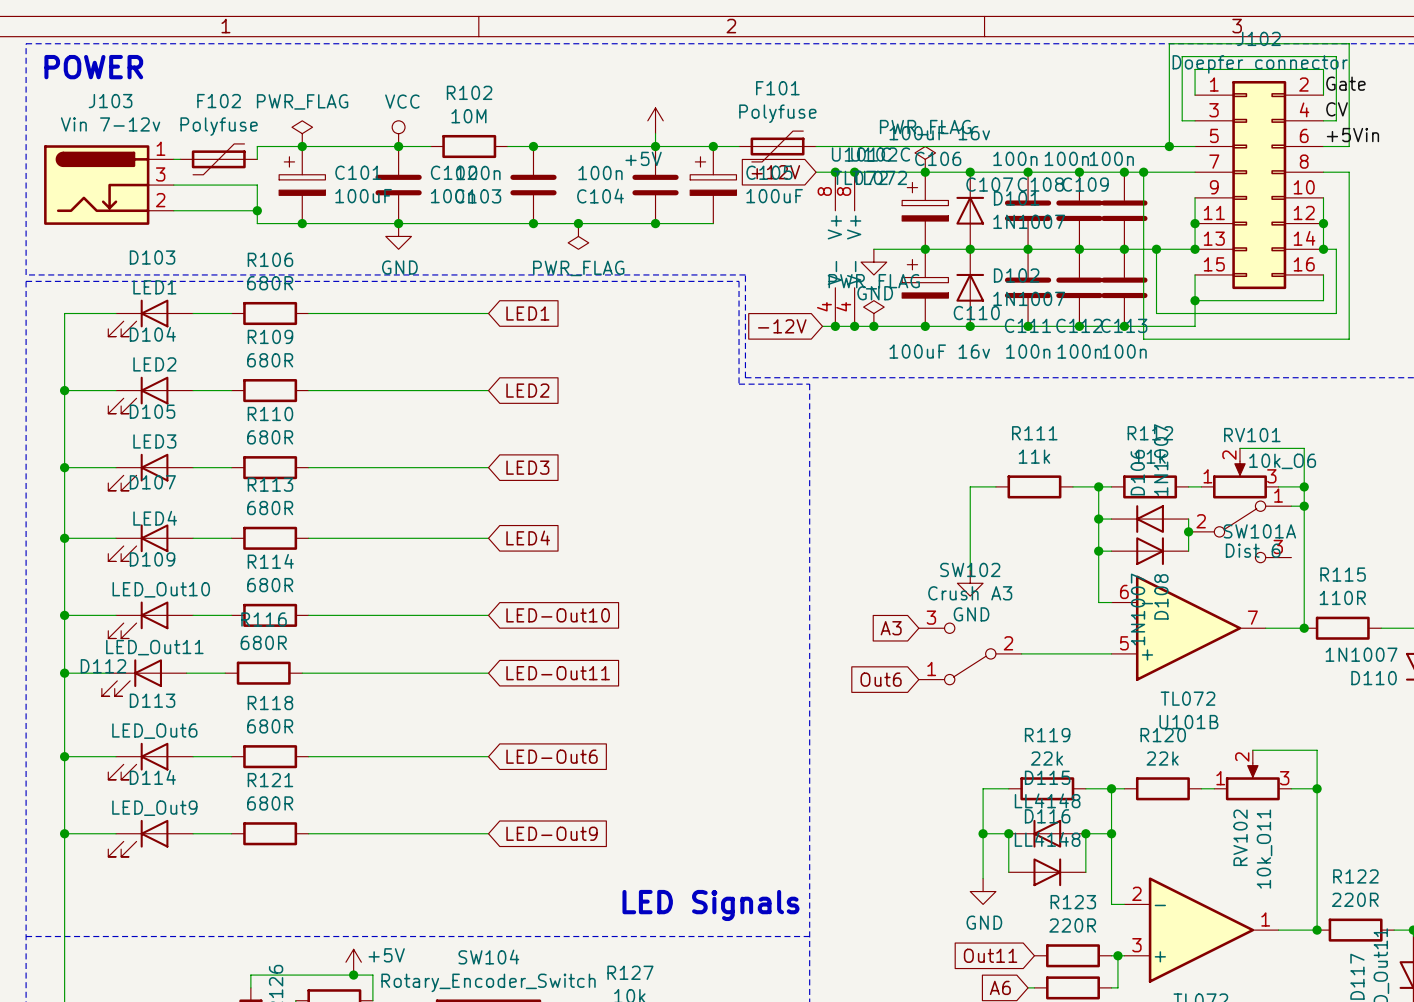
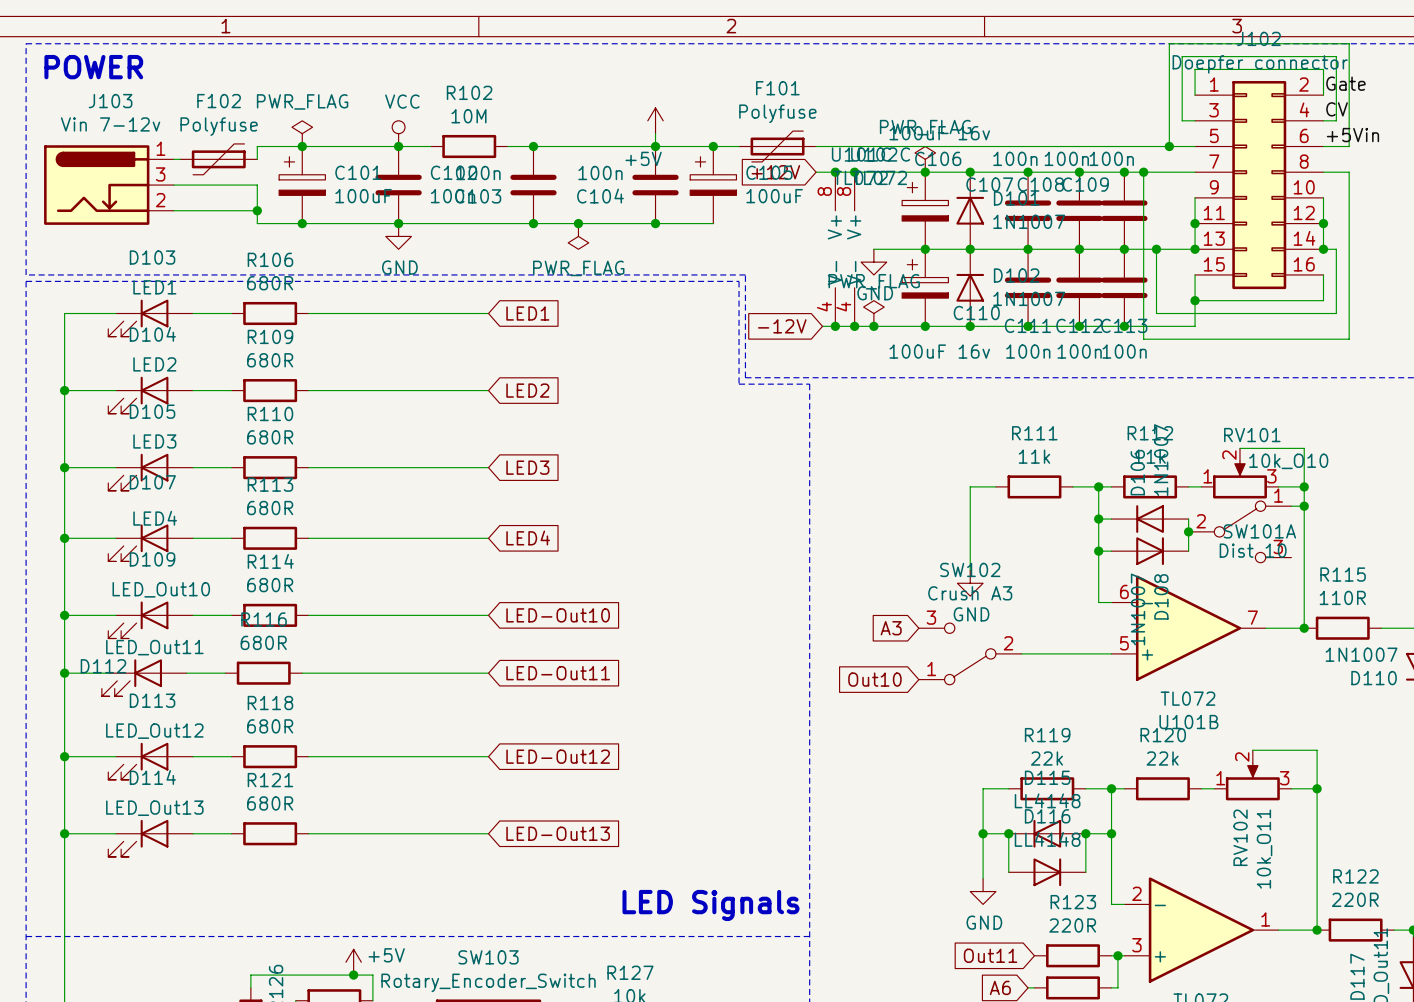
RV101 value: 10k_O6 (1282, 461) -> 10k_O10 (1288, 461)
SW101A value: Dist 6 (1253, 550) -> Dist 10 (1253, 550)
global label: Out6 (881, 679) -> Out10 (874, 679)
D113 value: LED_Out6 (154, 731) -> LED_Out12 (154, 731)
global label: LED-Out6 (552, 756) -> LED-Out12 (558, 756)
D114 value: LED_Out9 (154, 808) -> LED_Out13 (154, 808)
global label: LED-Out9 (552, 833) -> LED-Out13 (558, 833)
SW104 name: SW104 (488, 957) -> SW103 (488, 957)

